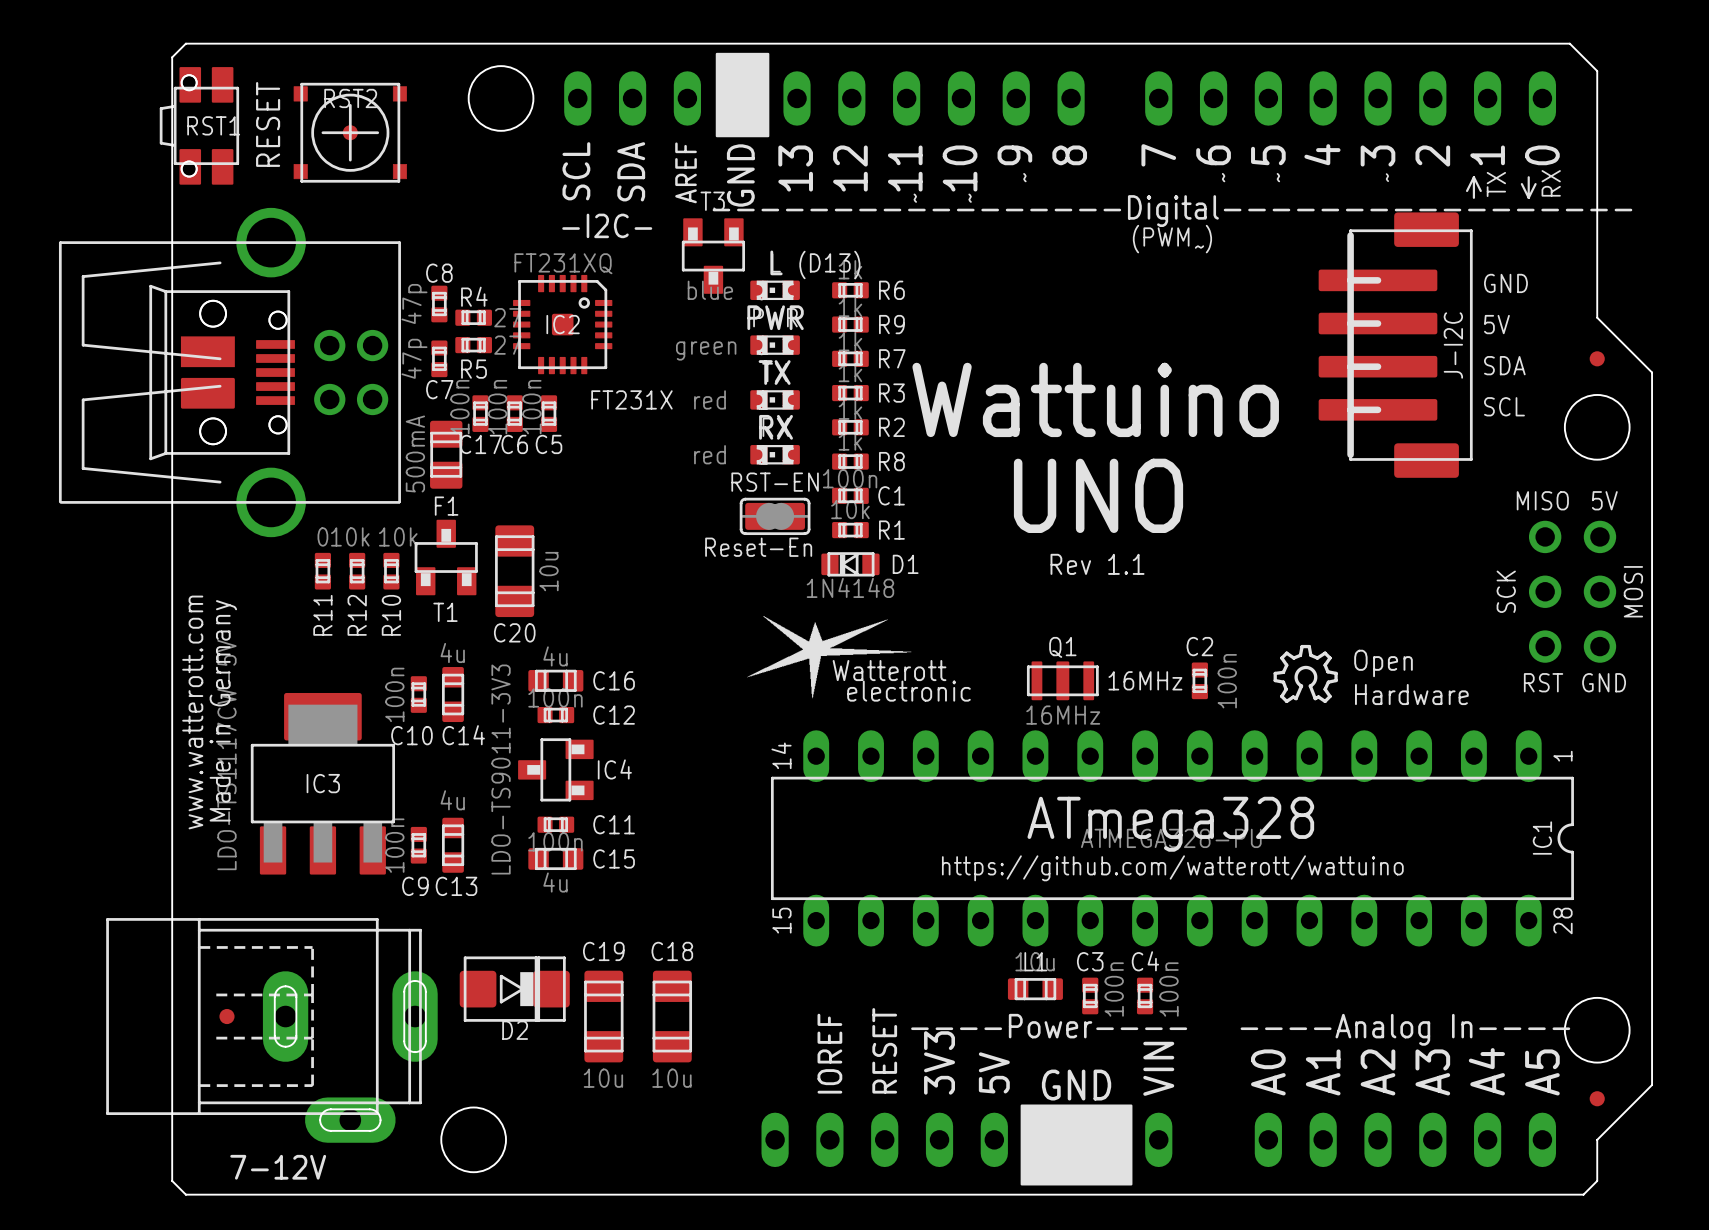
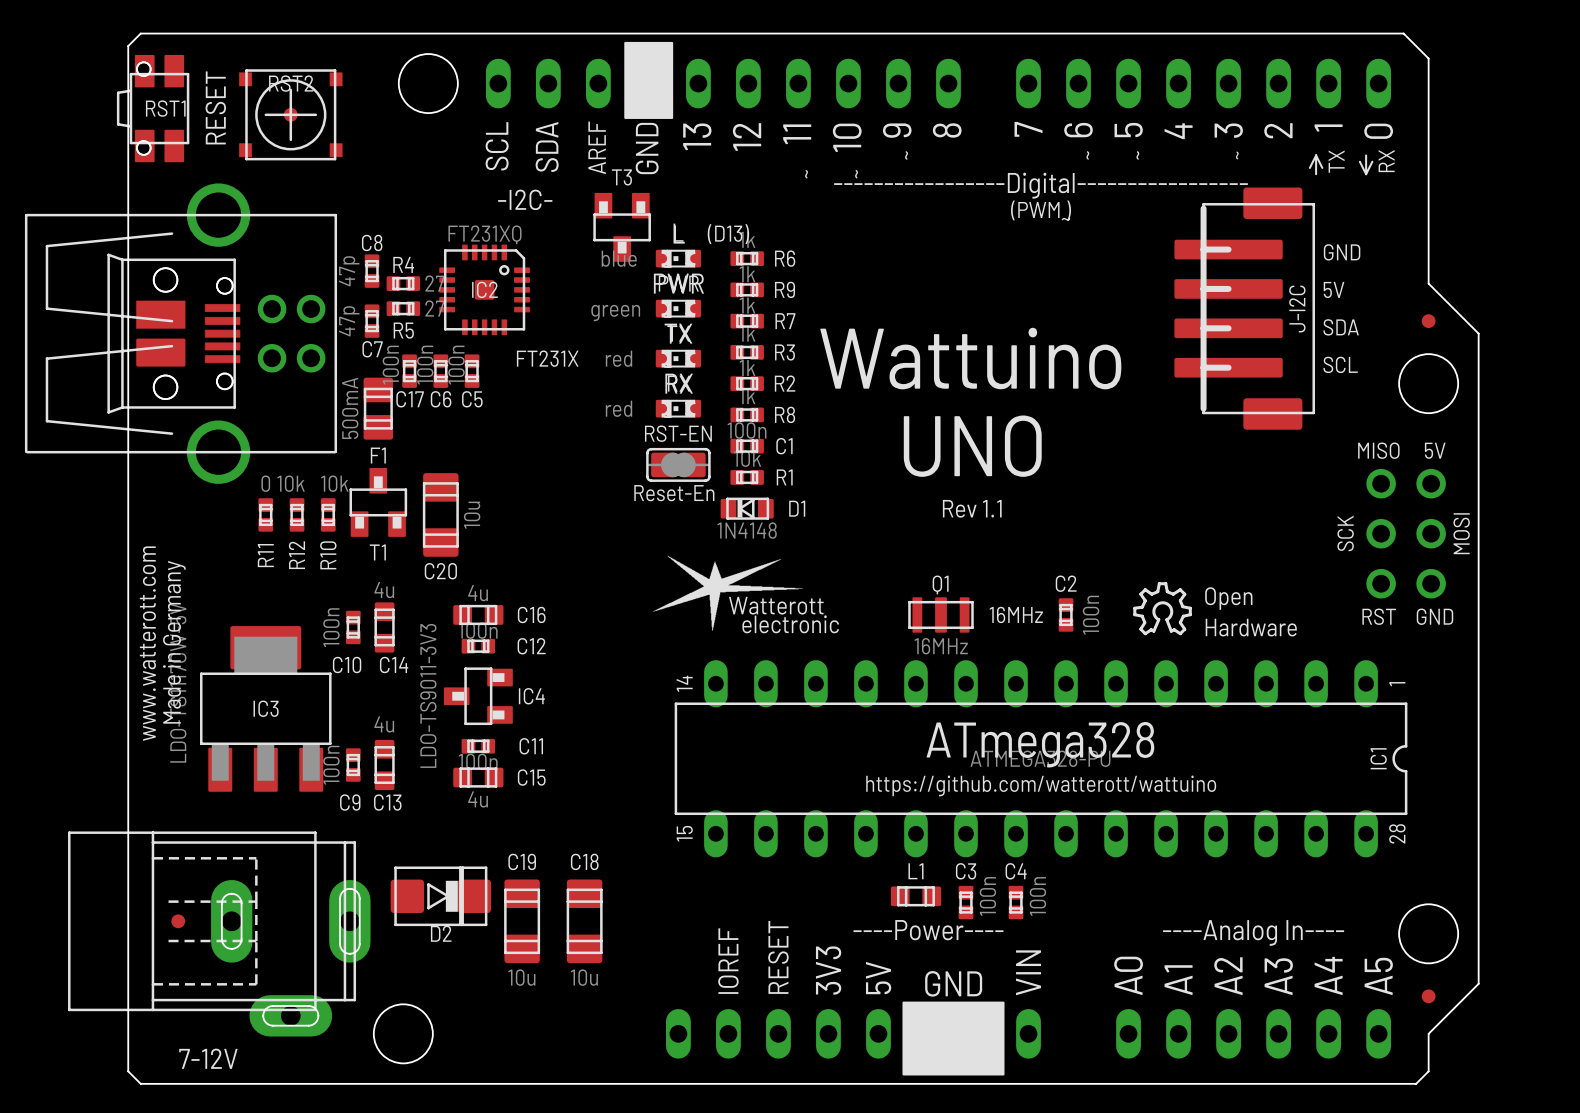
L1 value: 10u (1035, 961) -> none

